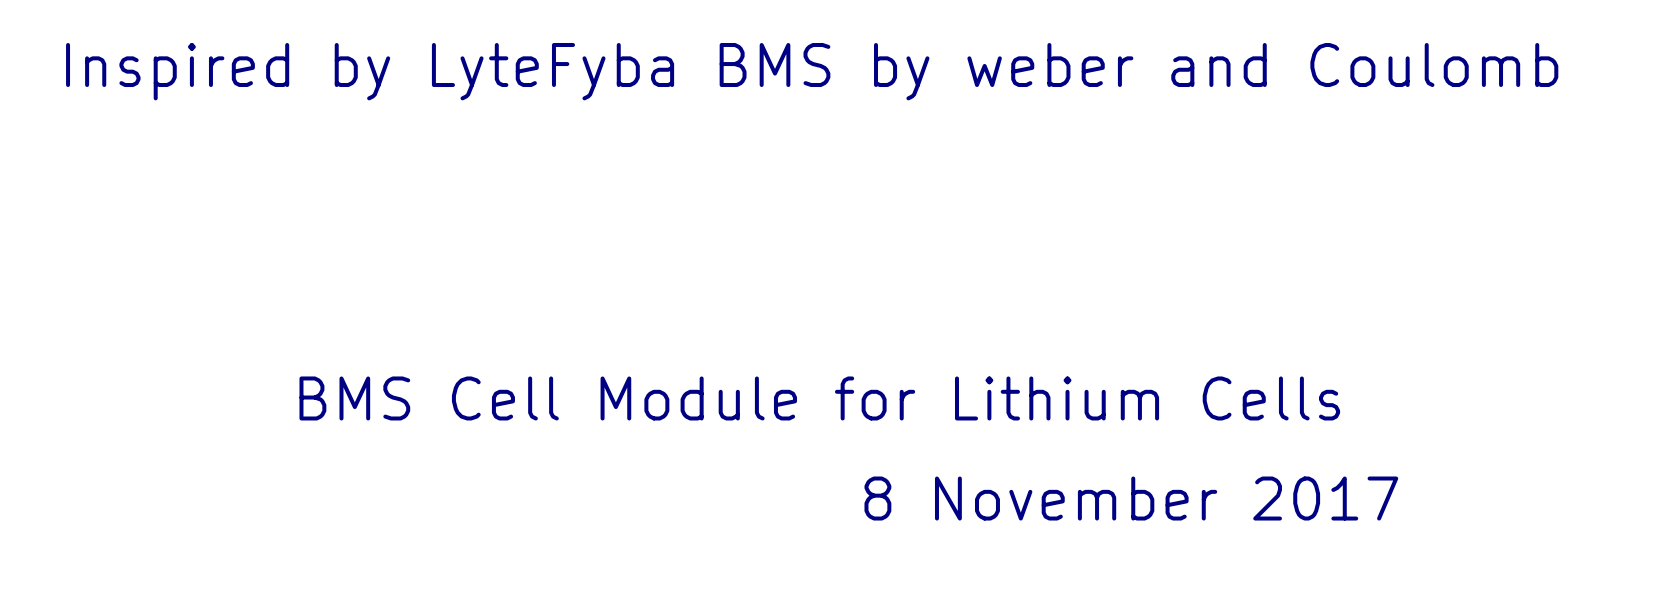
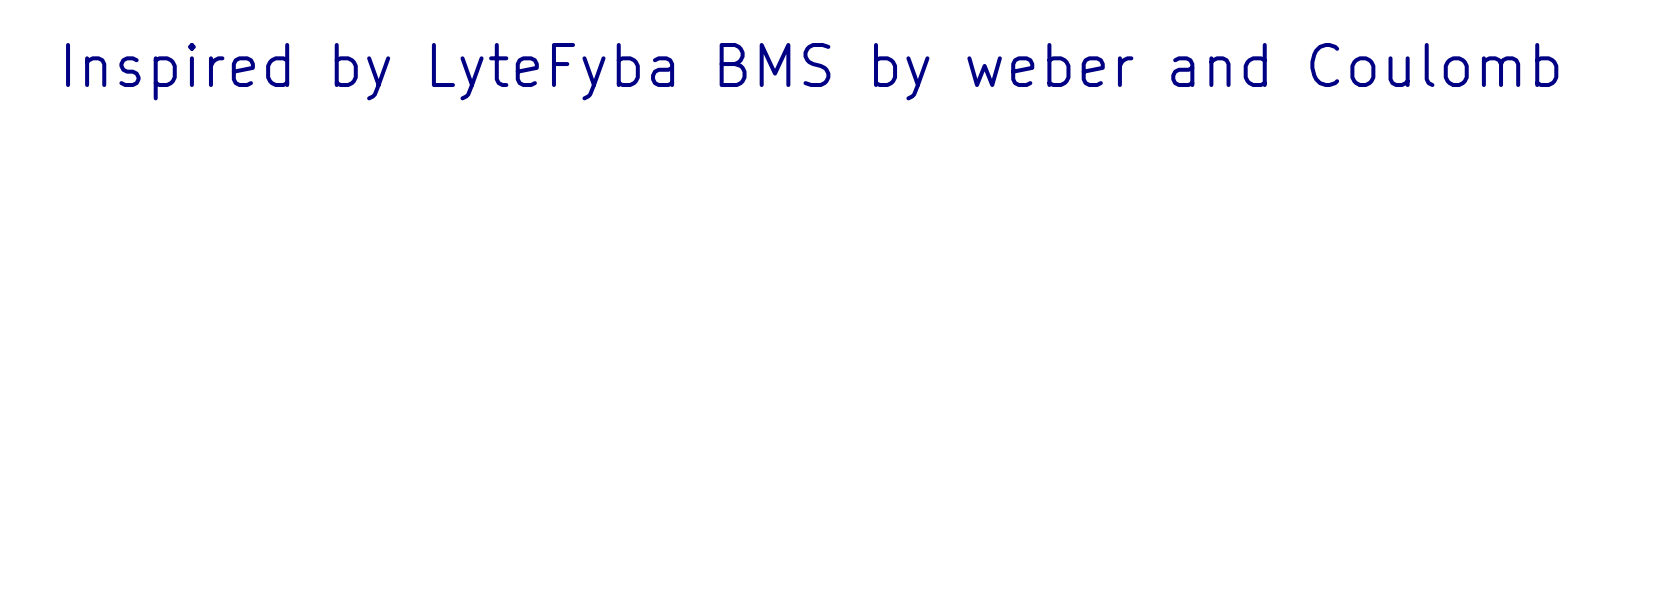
text: BMS Cell Module for Lithium Cells (819, 398) -> none
text: 8 November 2017 (1131, 498) -> none

